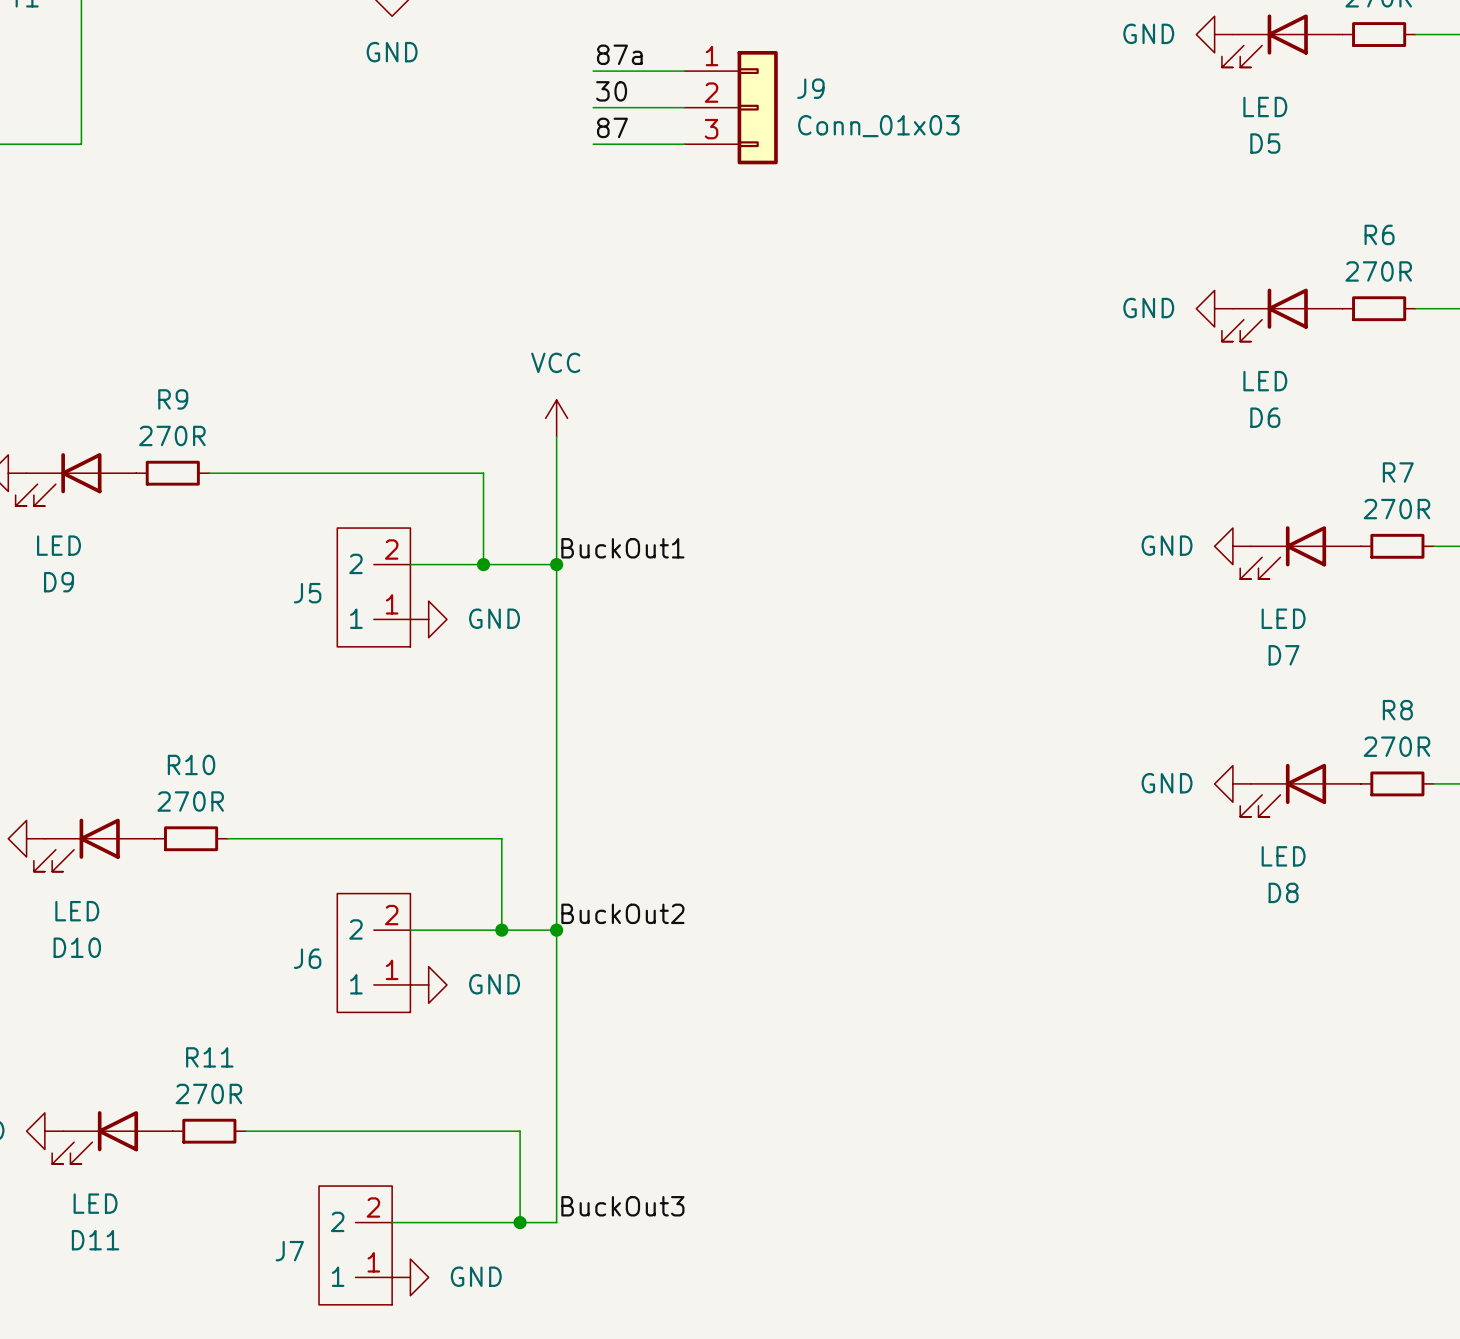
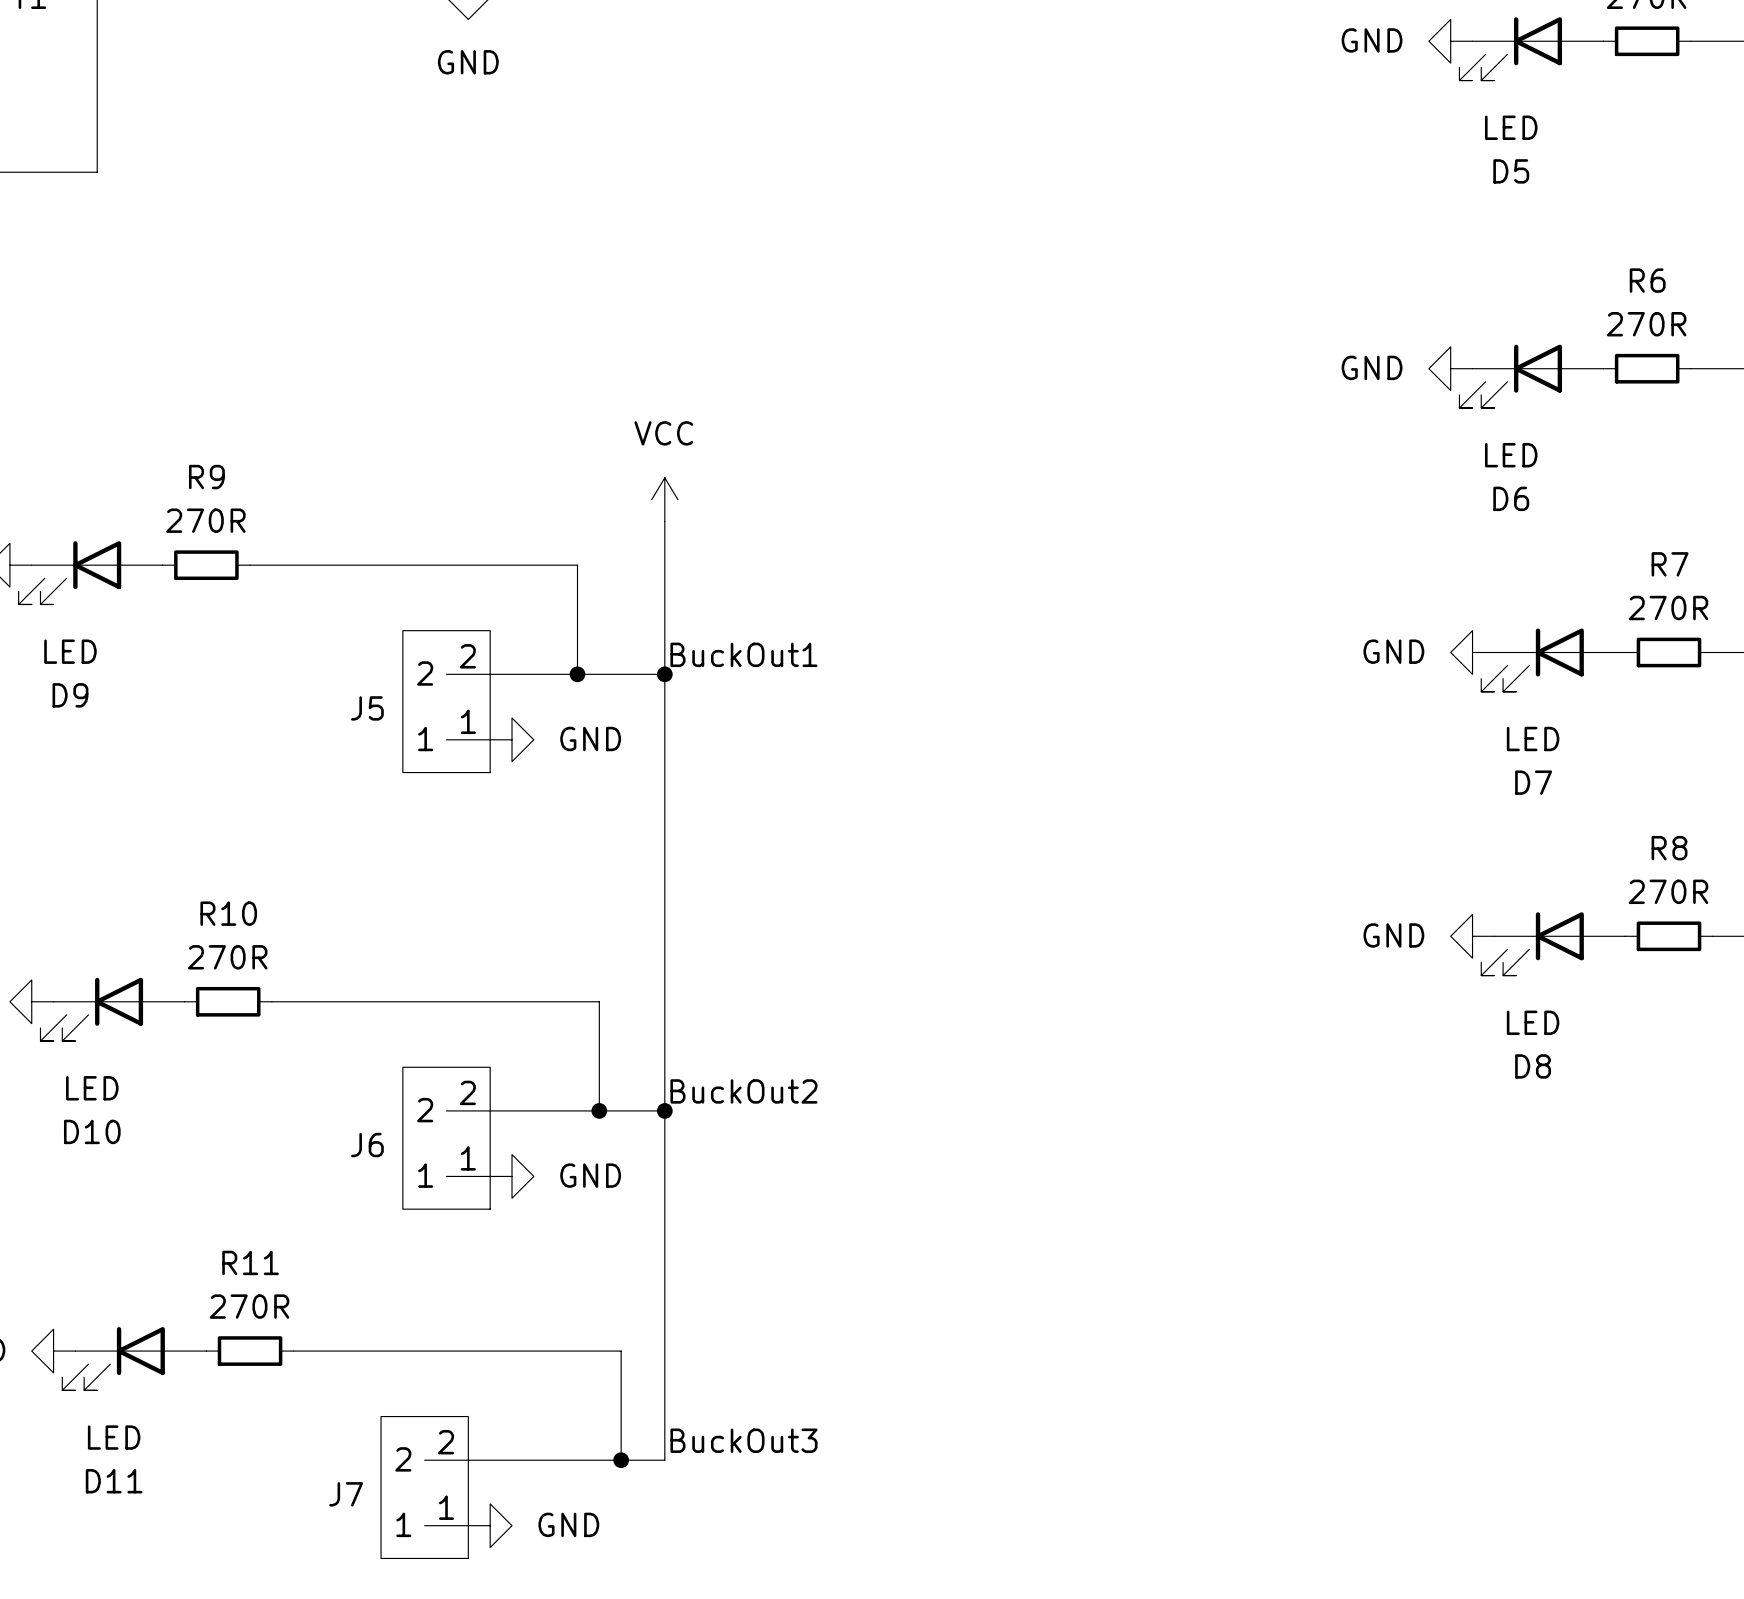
label: 87a (619, 54) -> none
wire: (593, 71) (684, 71) -> none
label: 30 (611, 91) -> none
wire: (593, 107) (684, 107) -> none
J9: Conn_01x03 (731, 107) -> none
label: 87 (612, 127) -> none
wire: (593, 144) (684, 144) -> none

